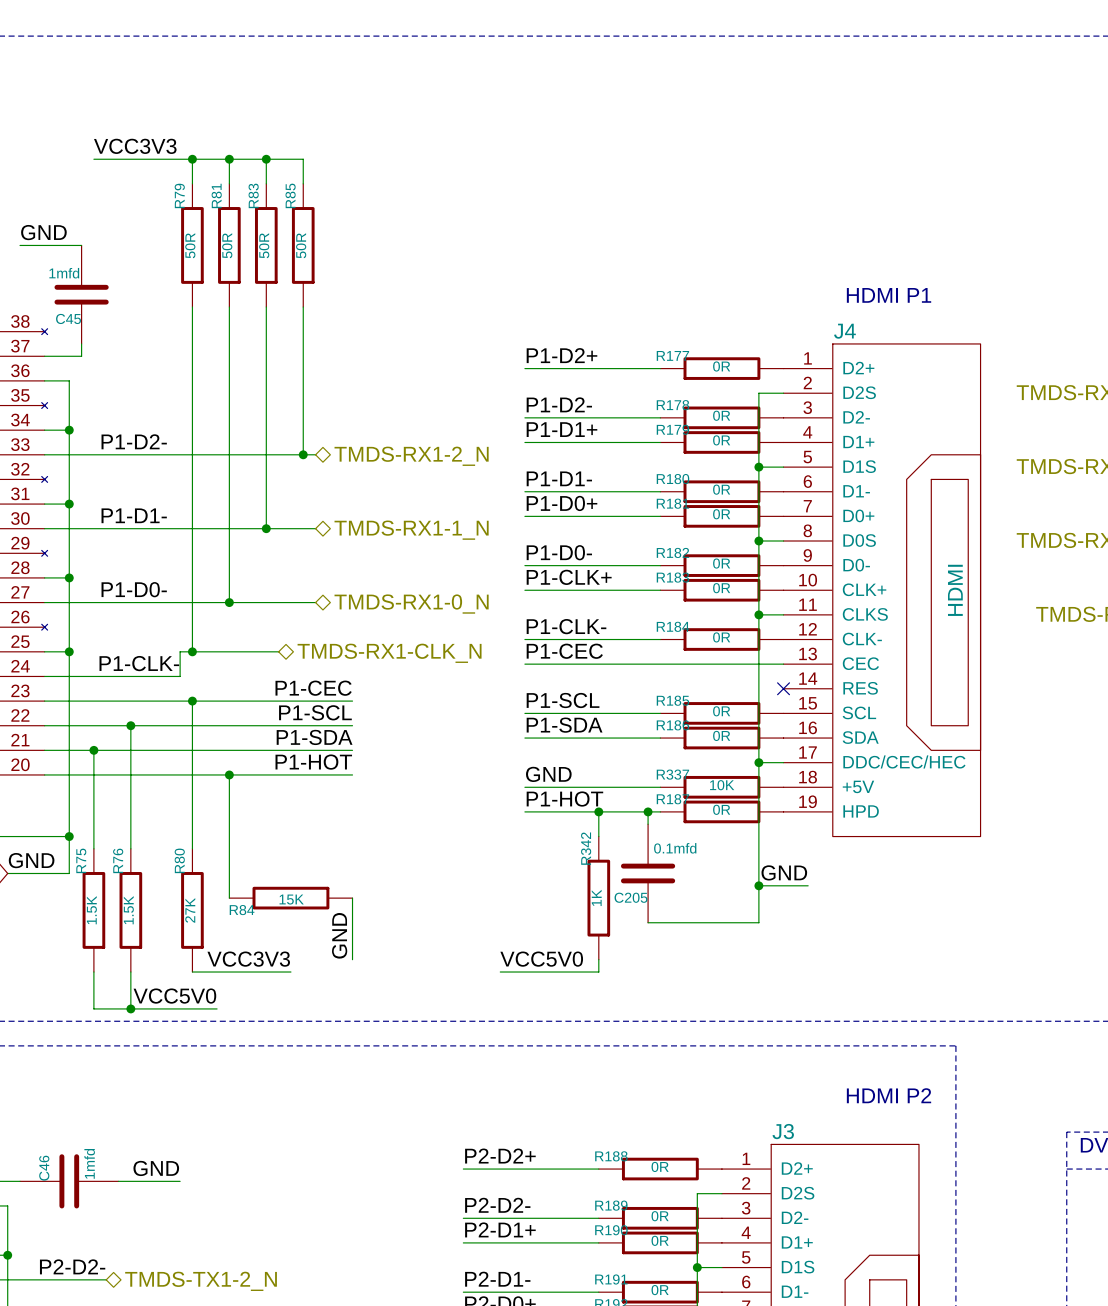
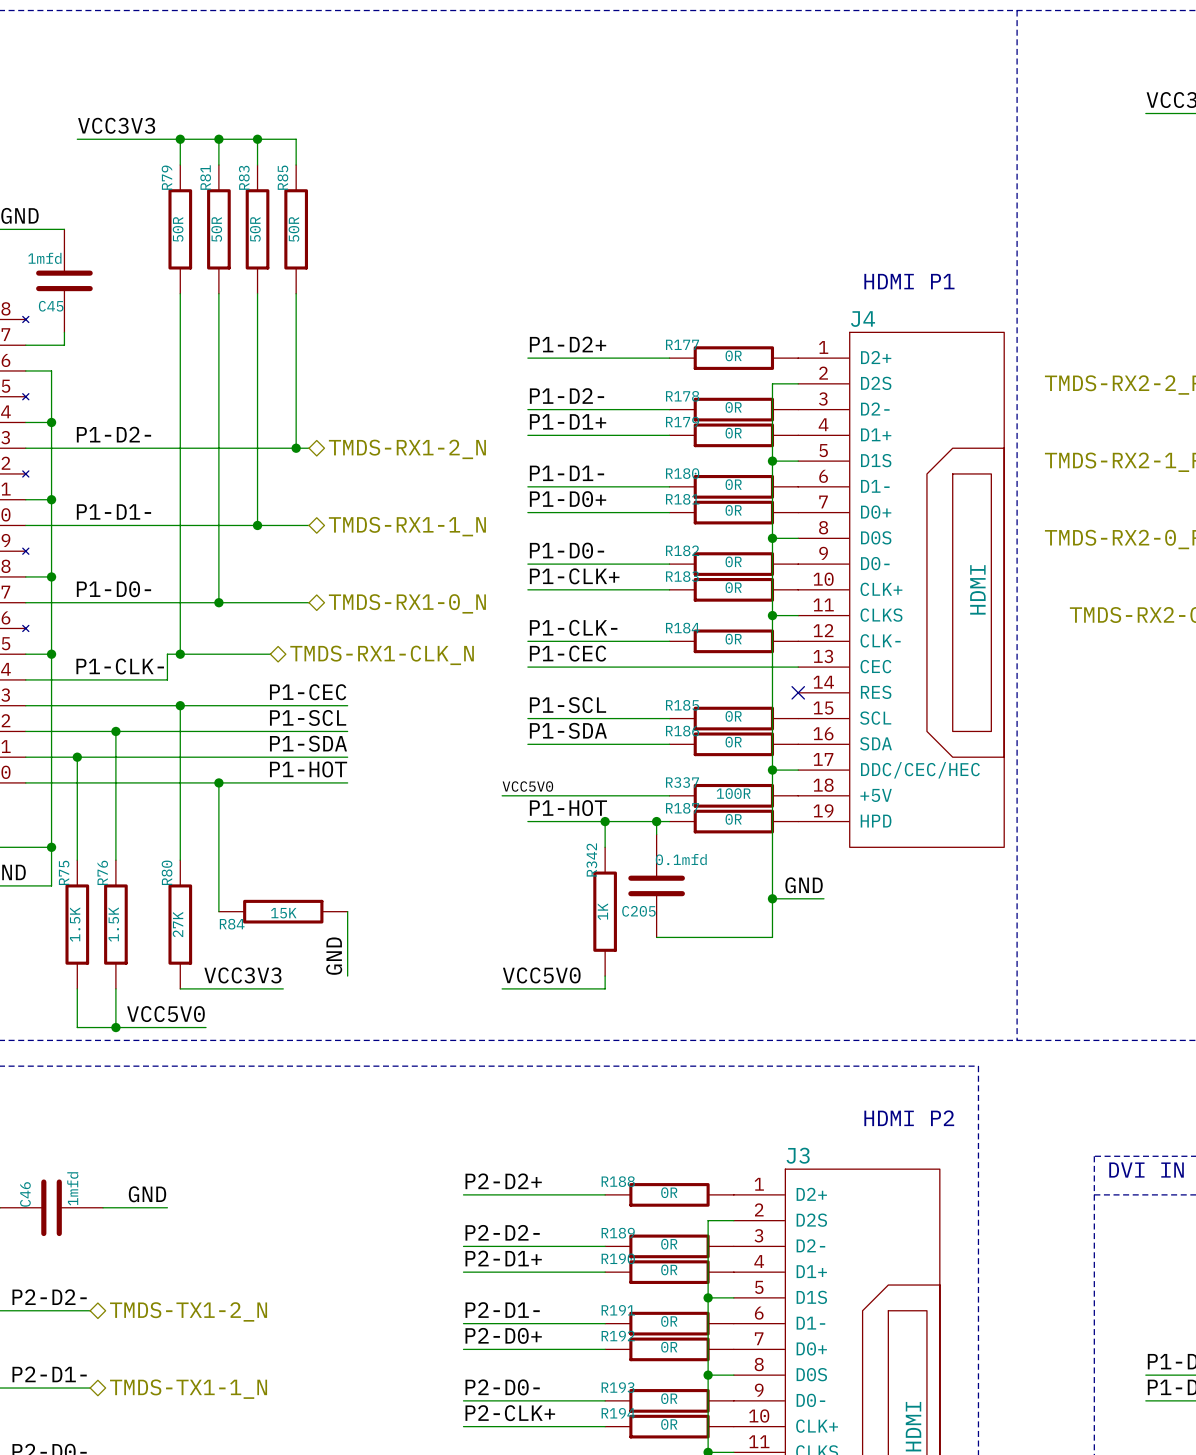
line: none -> (1017, 10) (1017, 1040)
label: GND (548, 774) -> none
label: none -> VCC5V0 (527, 786)
R337 value: 10K (722, 785) -> 100R (733, 793)
wire: none -> (502, 795) (527, 795)

